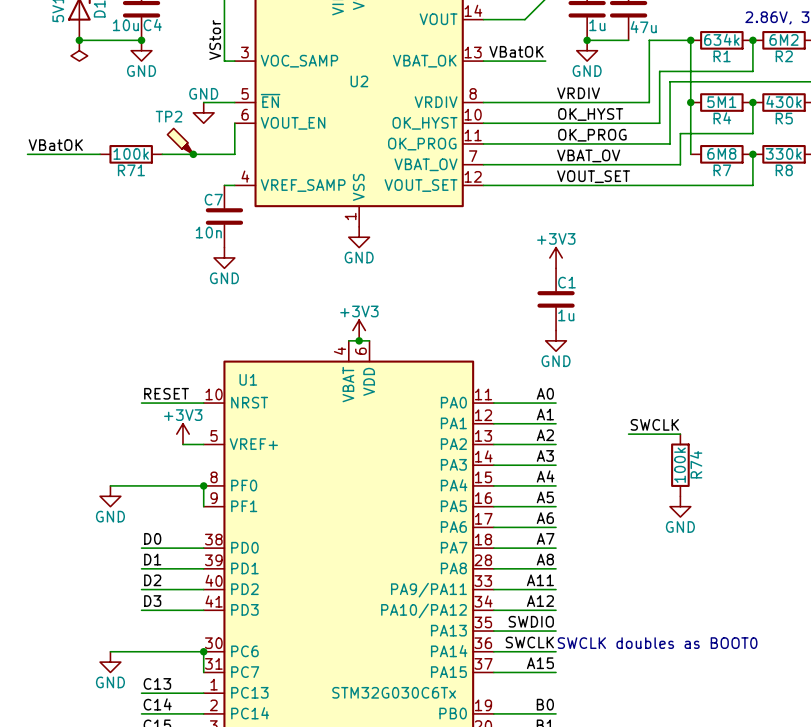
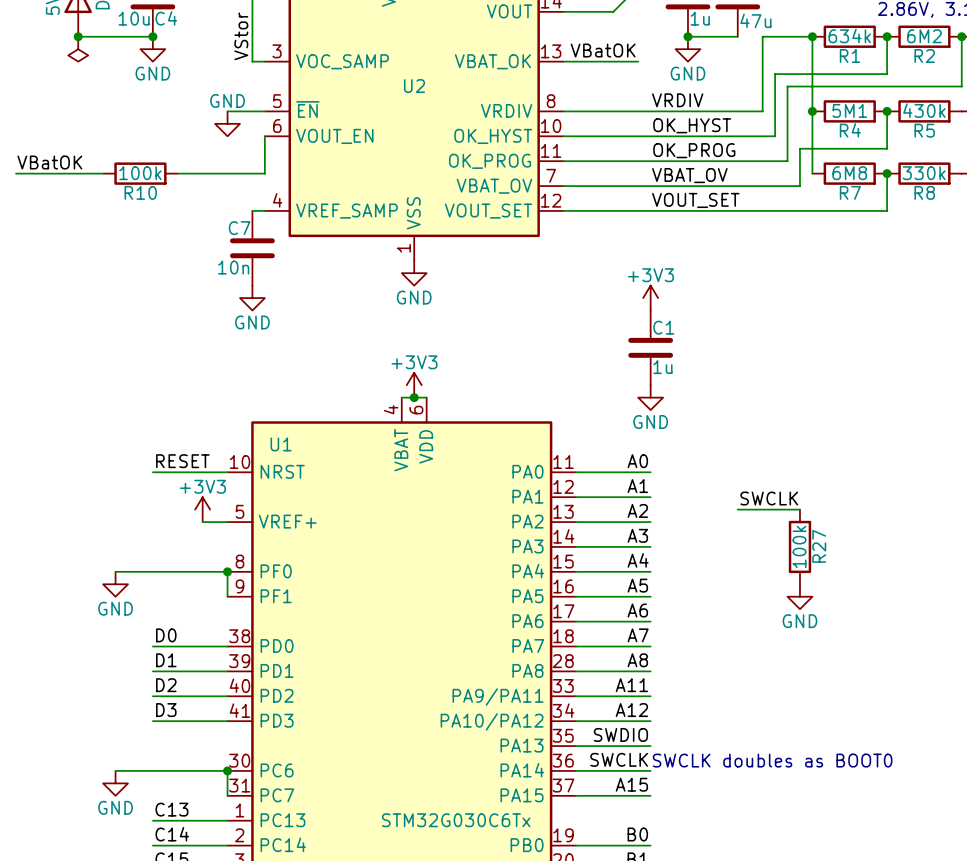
TP2: (180, 141) -> none
junction: (193, 154) -> none
R71 name: R71 (131, 170) -> R10 (140, 192)
R74 name: R74 (696, 464) -> R27 (819, 546)

